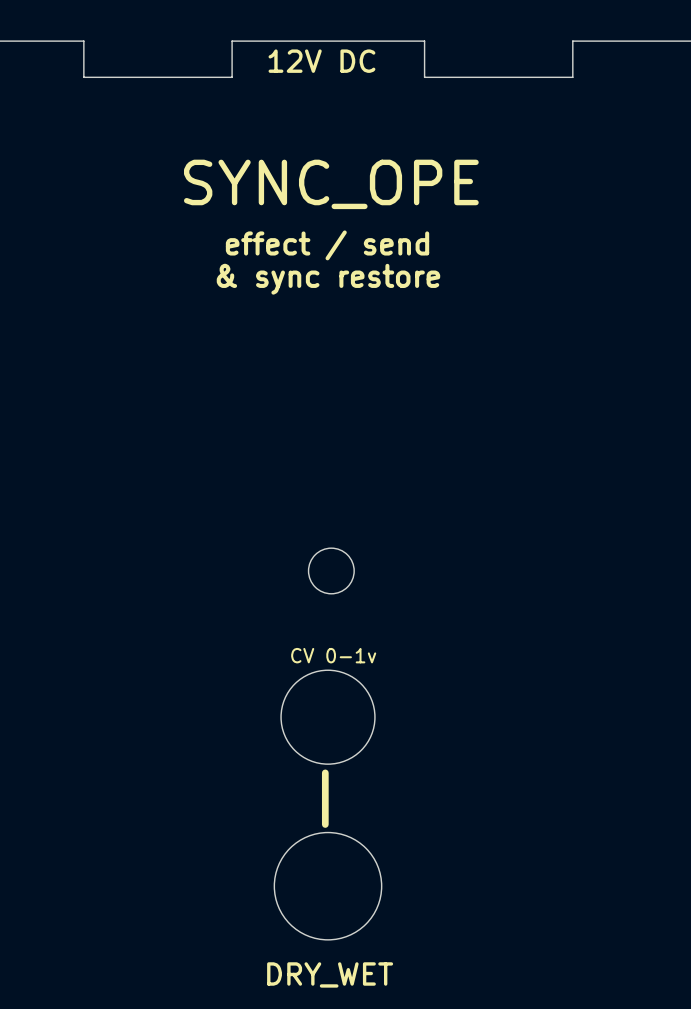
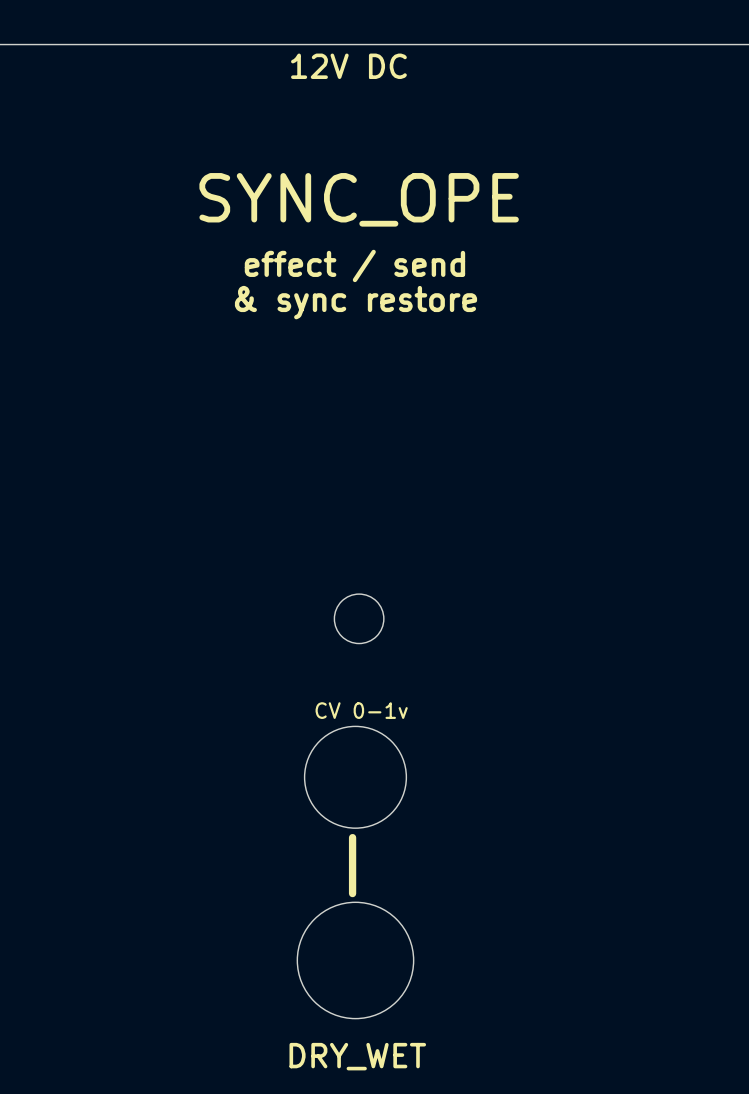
board edge: (83, 41) (83, 77) (232, 77) (232, 41) -> (90, 44) (251, 44)
board edge: (424, 41) (424, 77) (572, 77) (572, 41) -> (460, 44) (620, 44)

